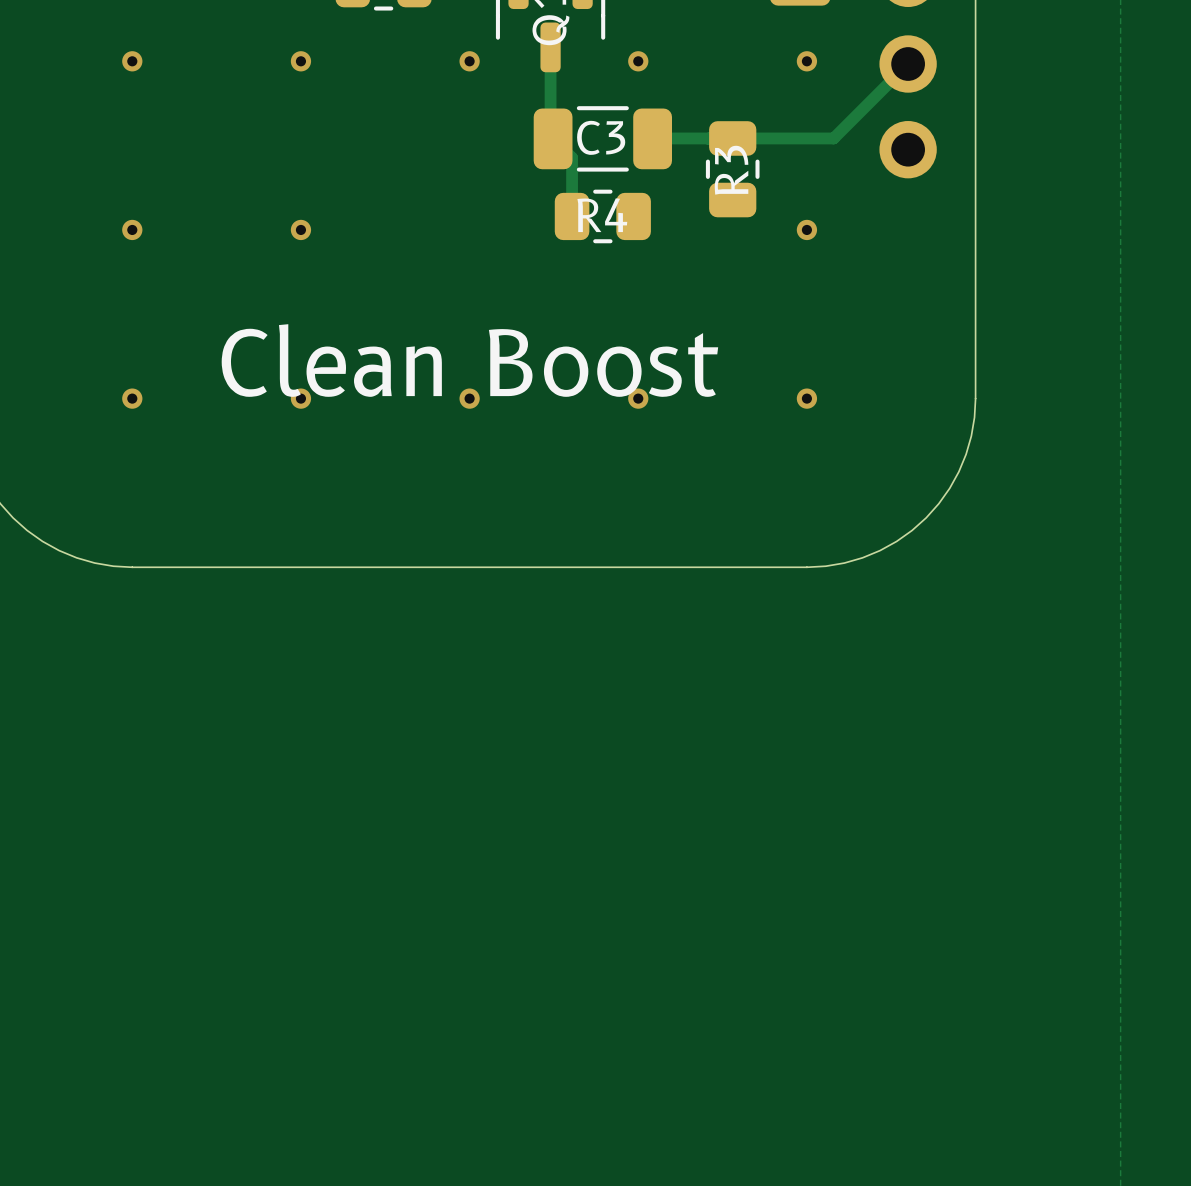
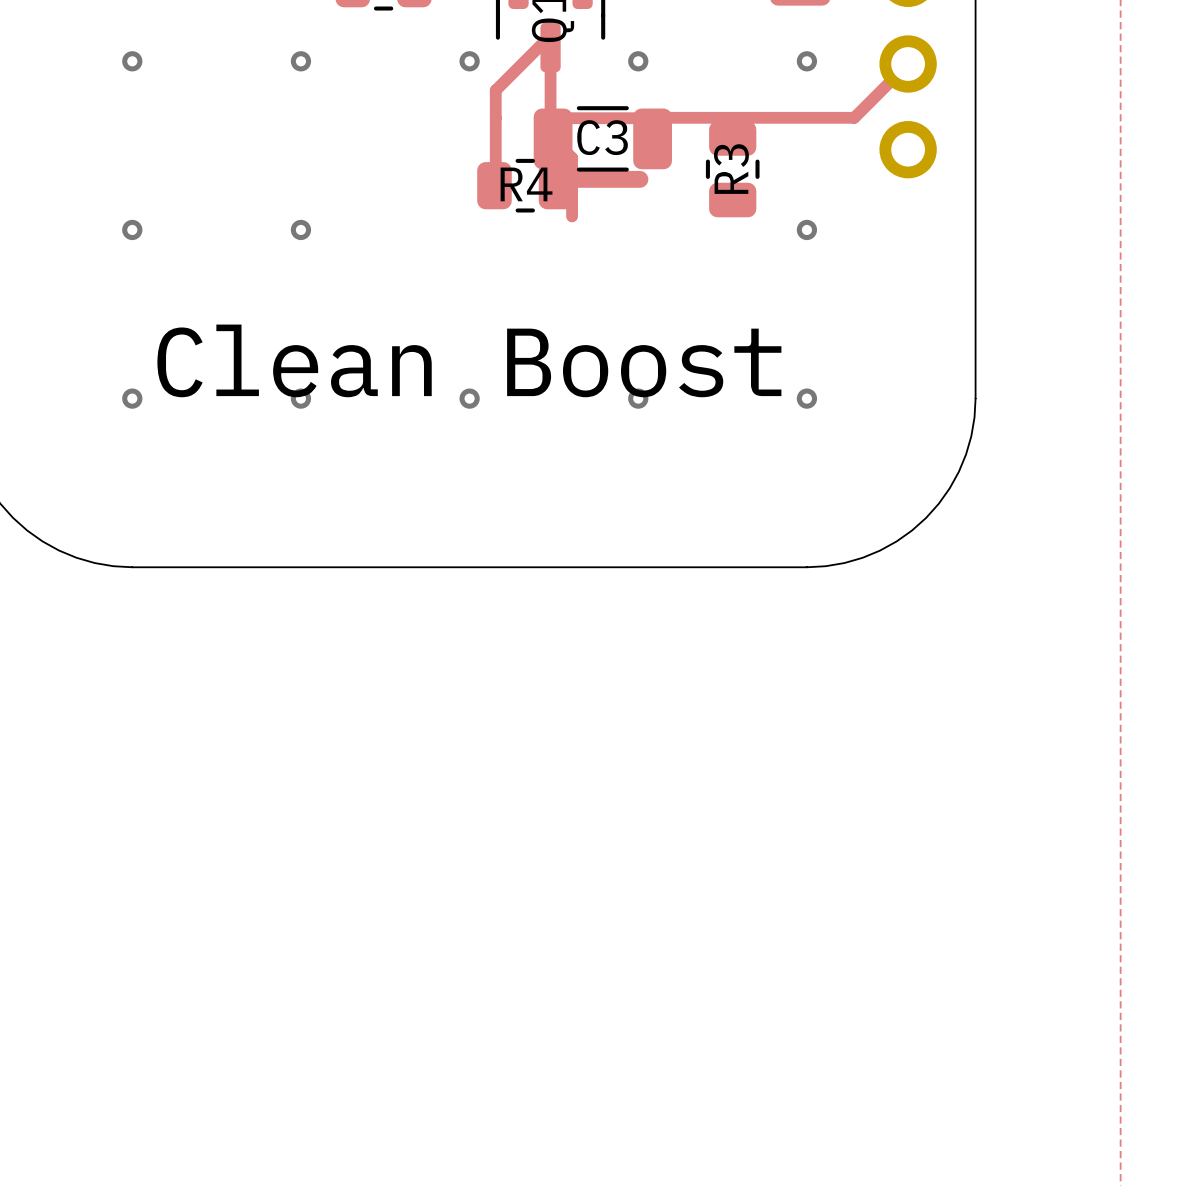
track: none -> (550, 35) (495, 90) (494, 185)
track: (854, 117) (833, 138) (653, 138) -> (854, 117) (639, 117)
track: none -> (554, 118) (639, 118)
track: none -> (639, 179) (562, 179) (556, 185)
R4 position: (602, 216) -> (525, 185)

